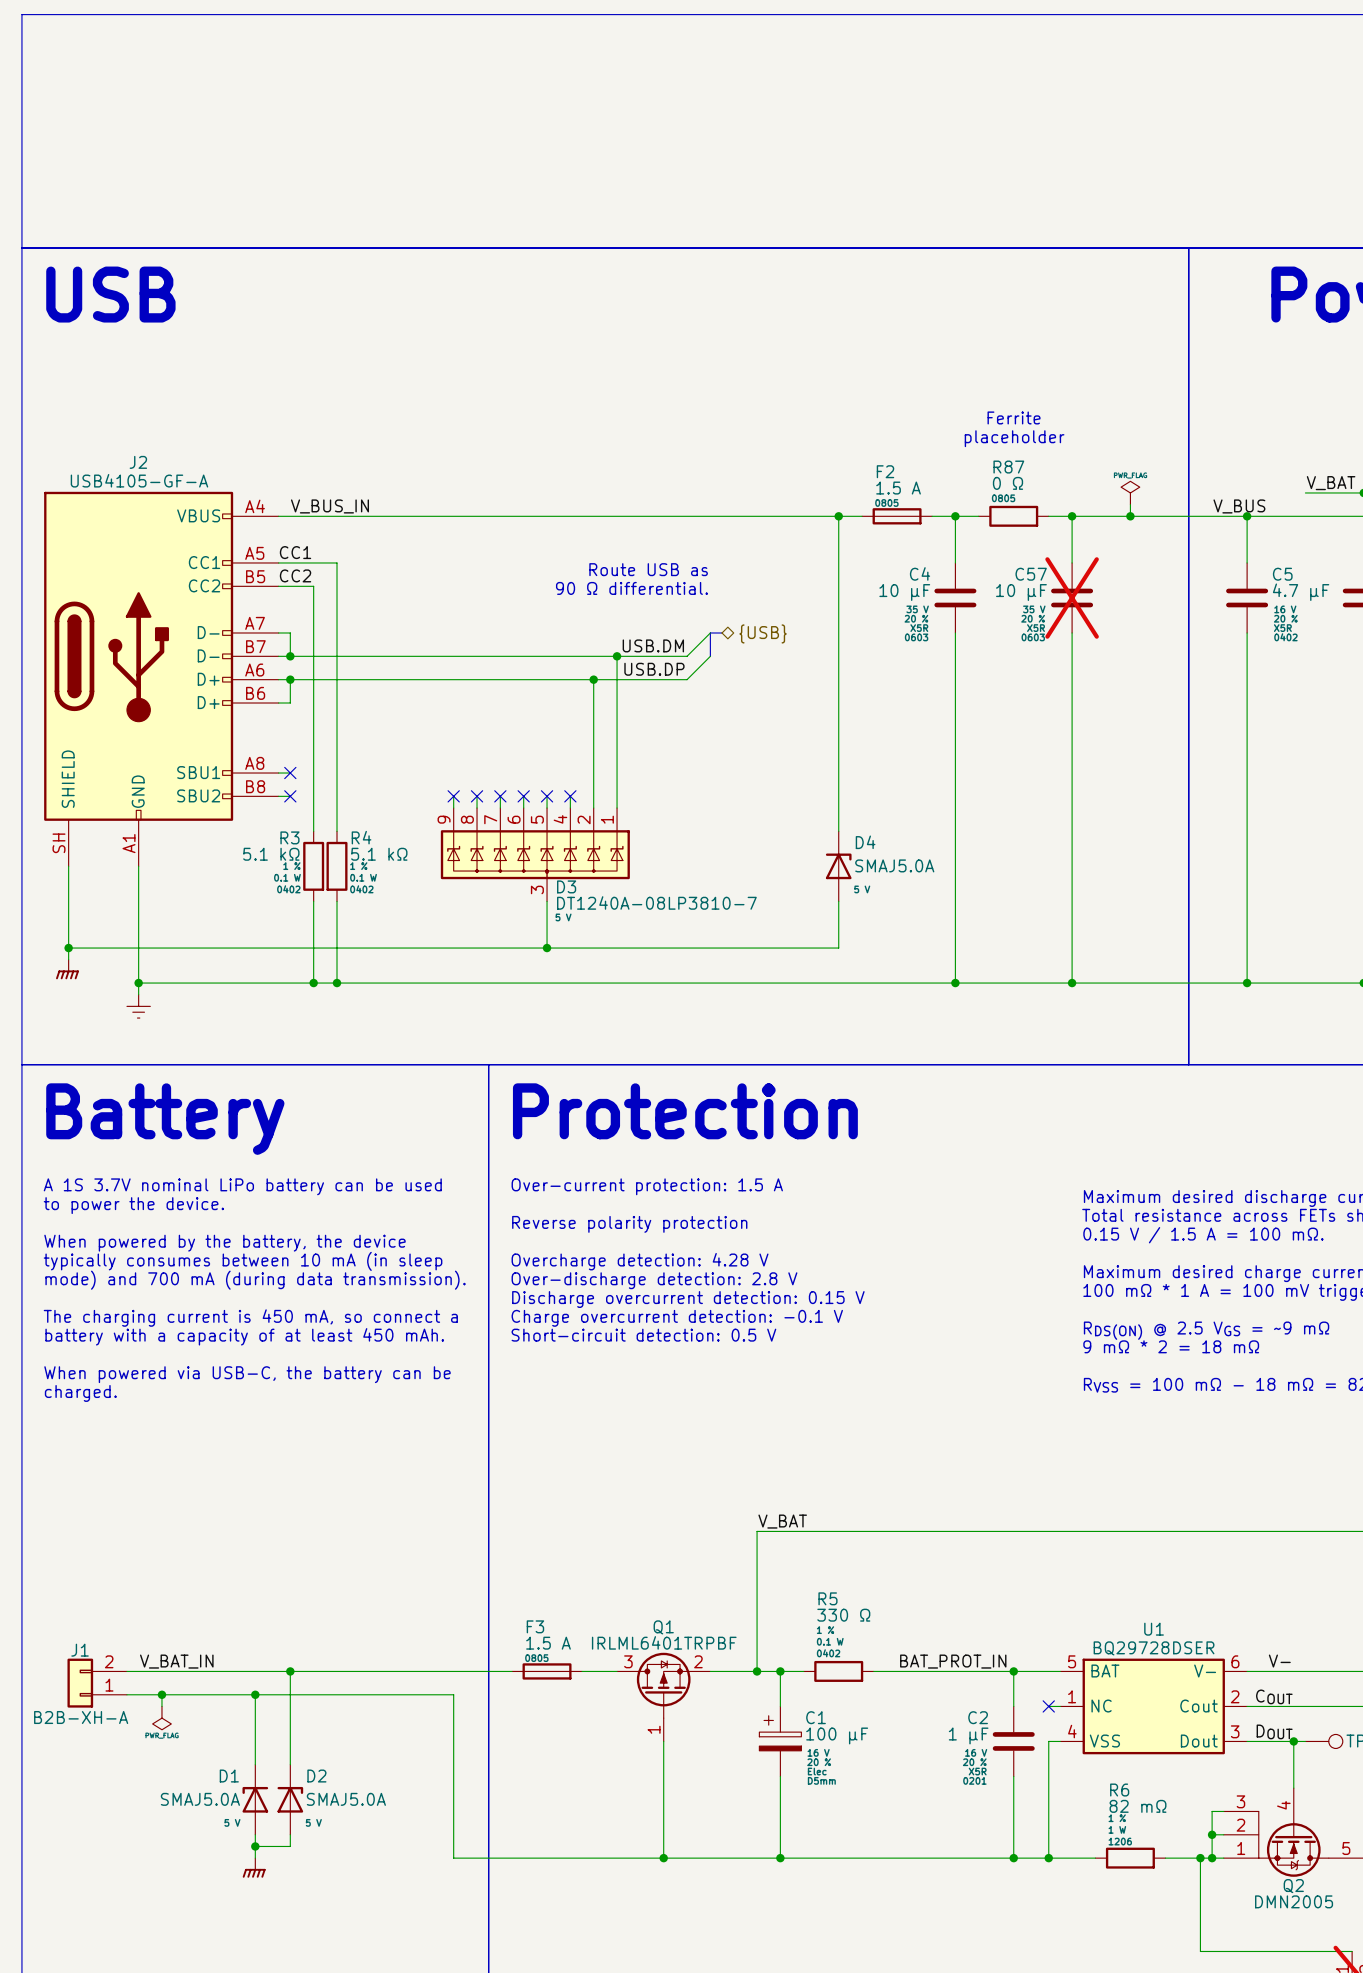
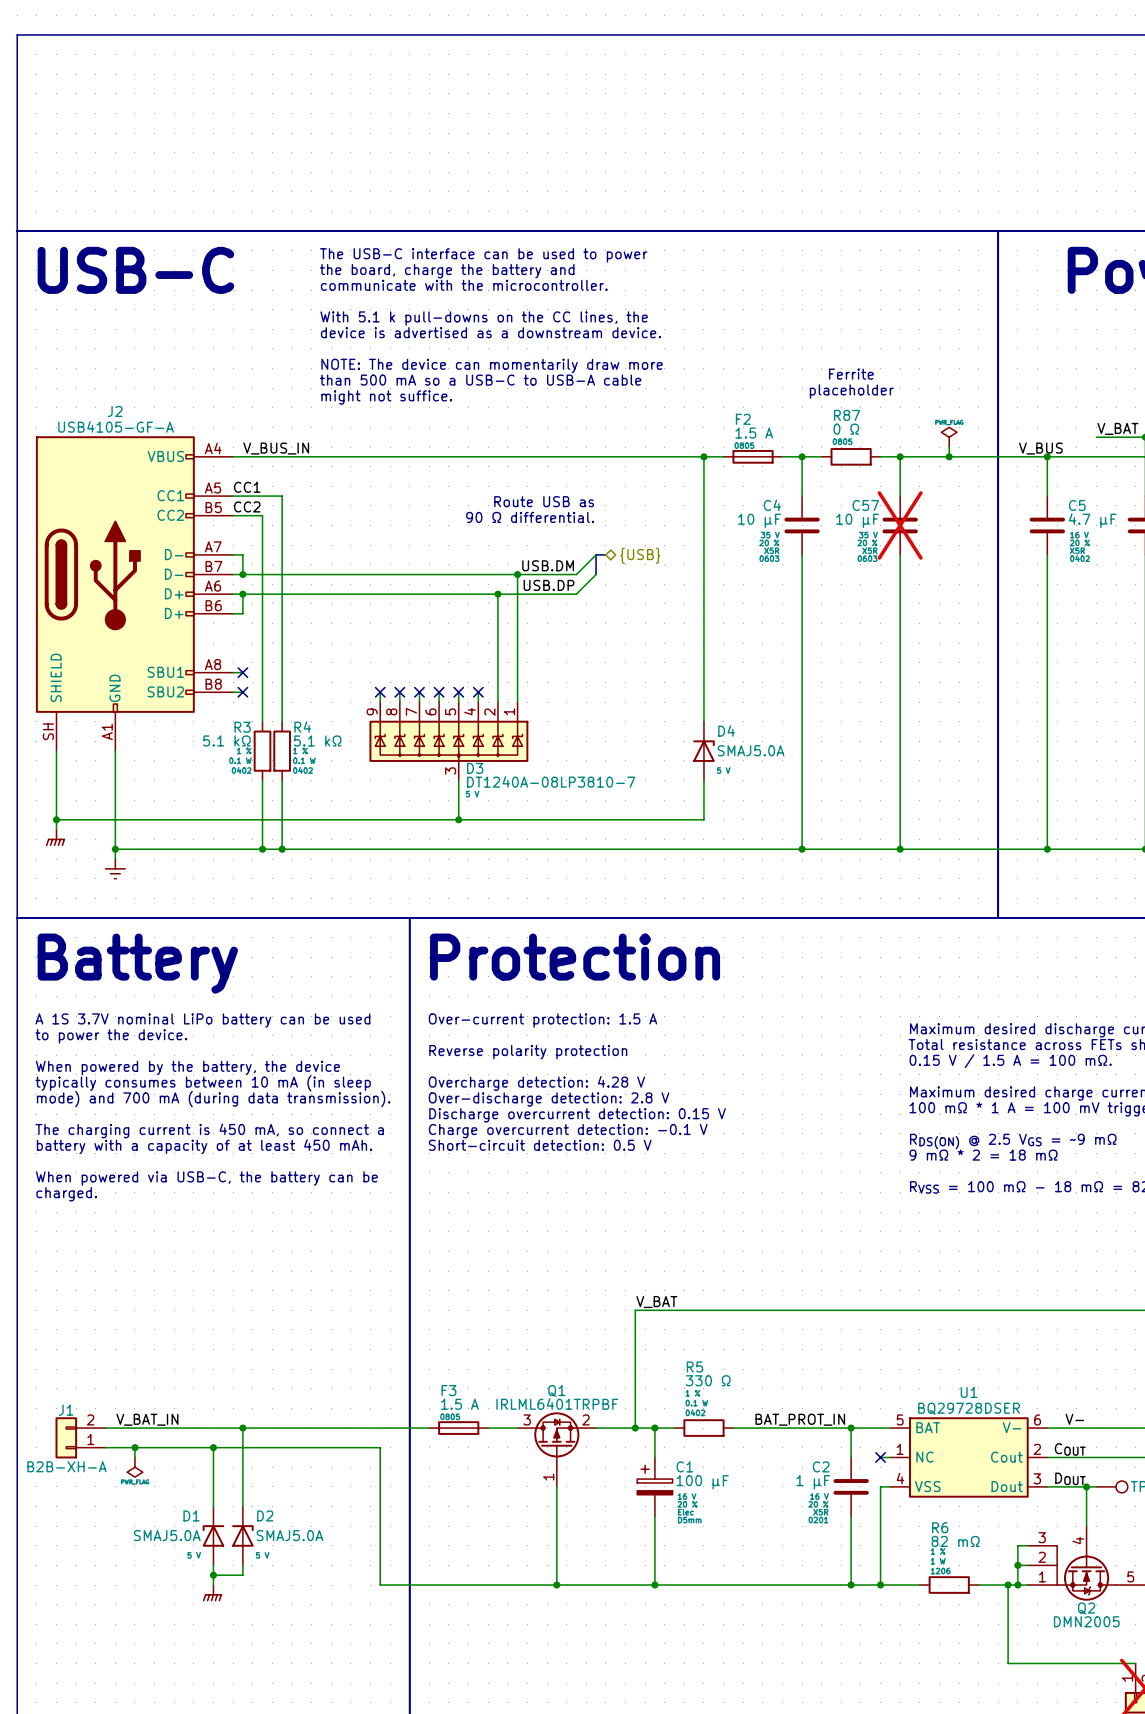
text: none -> The USB-C interface can be used to power (483, 255)
text: USB (110, 294) -> USB-C (135, 270)
text: none -> the board, charge the battery and (447, 271)
text: none -> communicate with the microcontroller. (464, 285)
text: none -> With 5.1 k pull-downs on the CC lines, the (484, 318)
text: none -> device is advertised as a downstream device. (490, 332)
text: none -> NOTE: The device can momentarily draw more (492, 365)
text: none -> than 500 mA so a USB-C to USB-A cable (480, 380)
text: none -> might not suffice. (386, 397)

